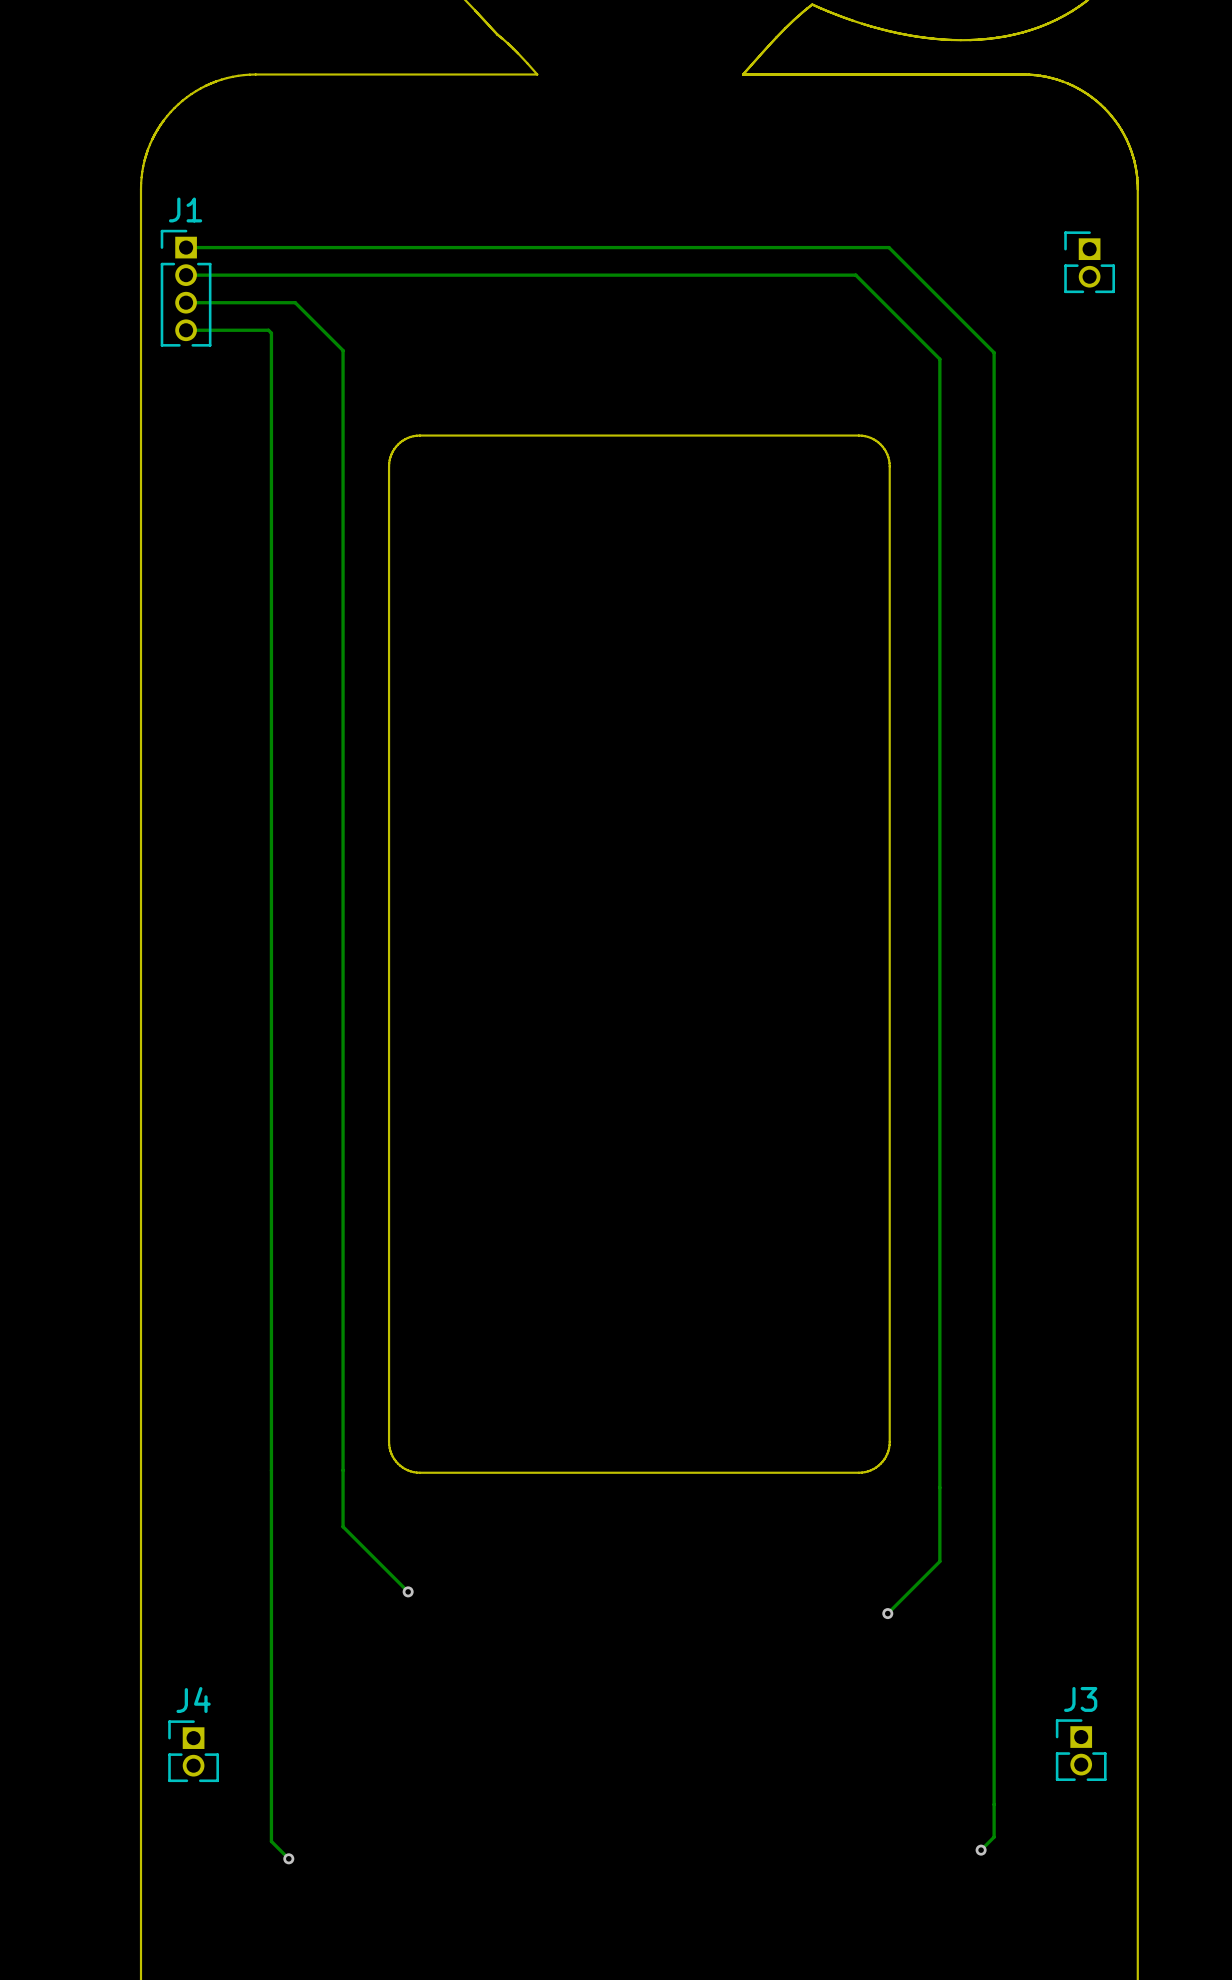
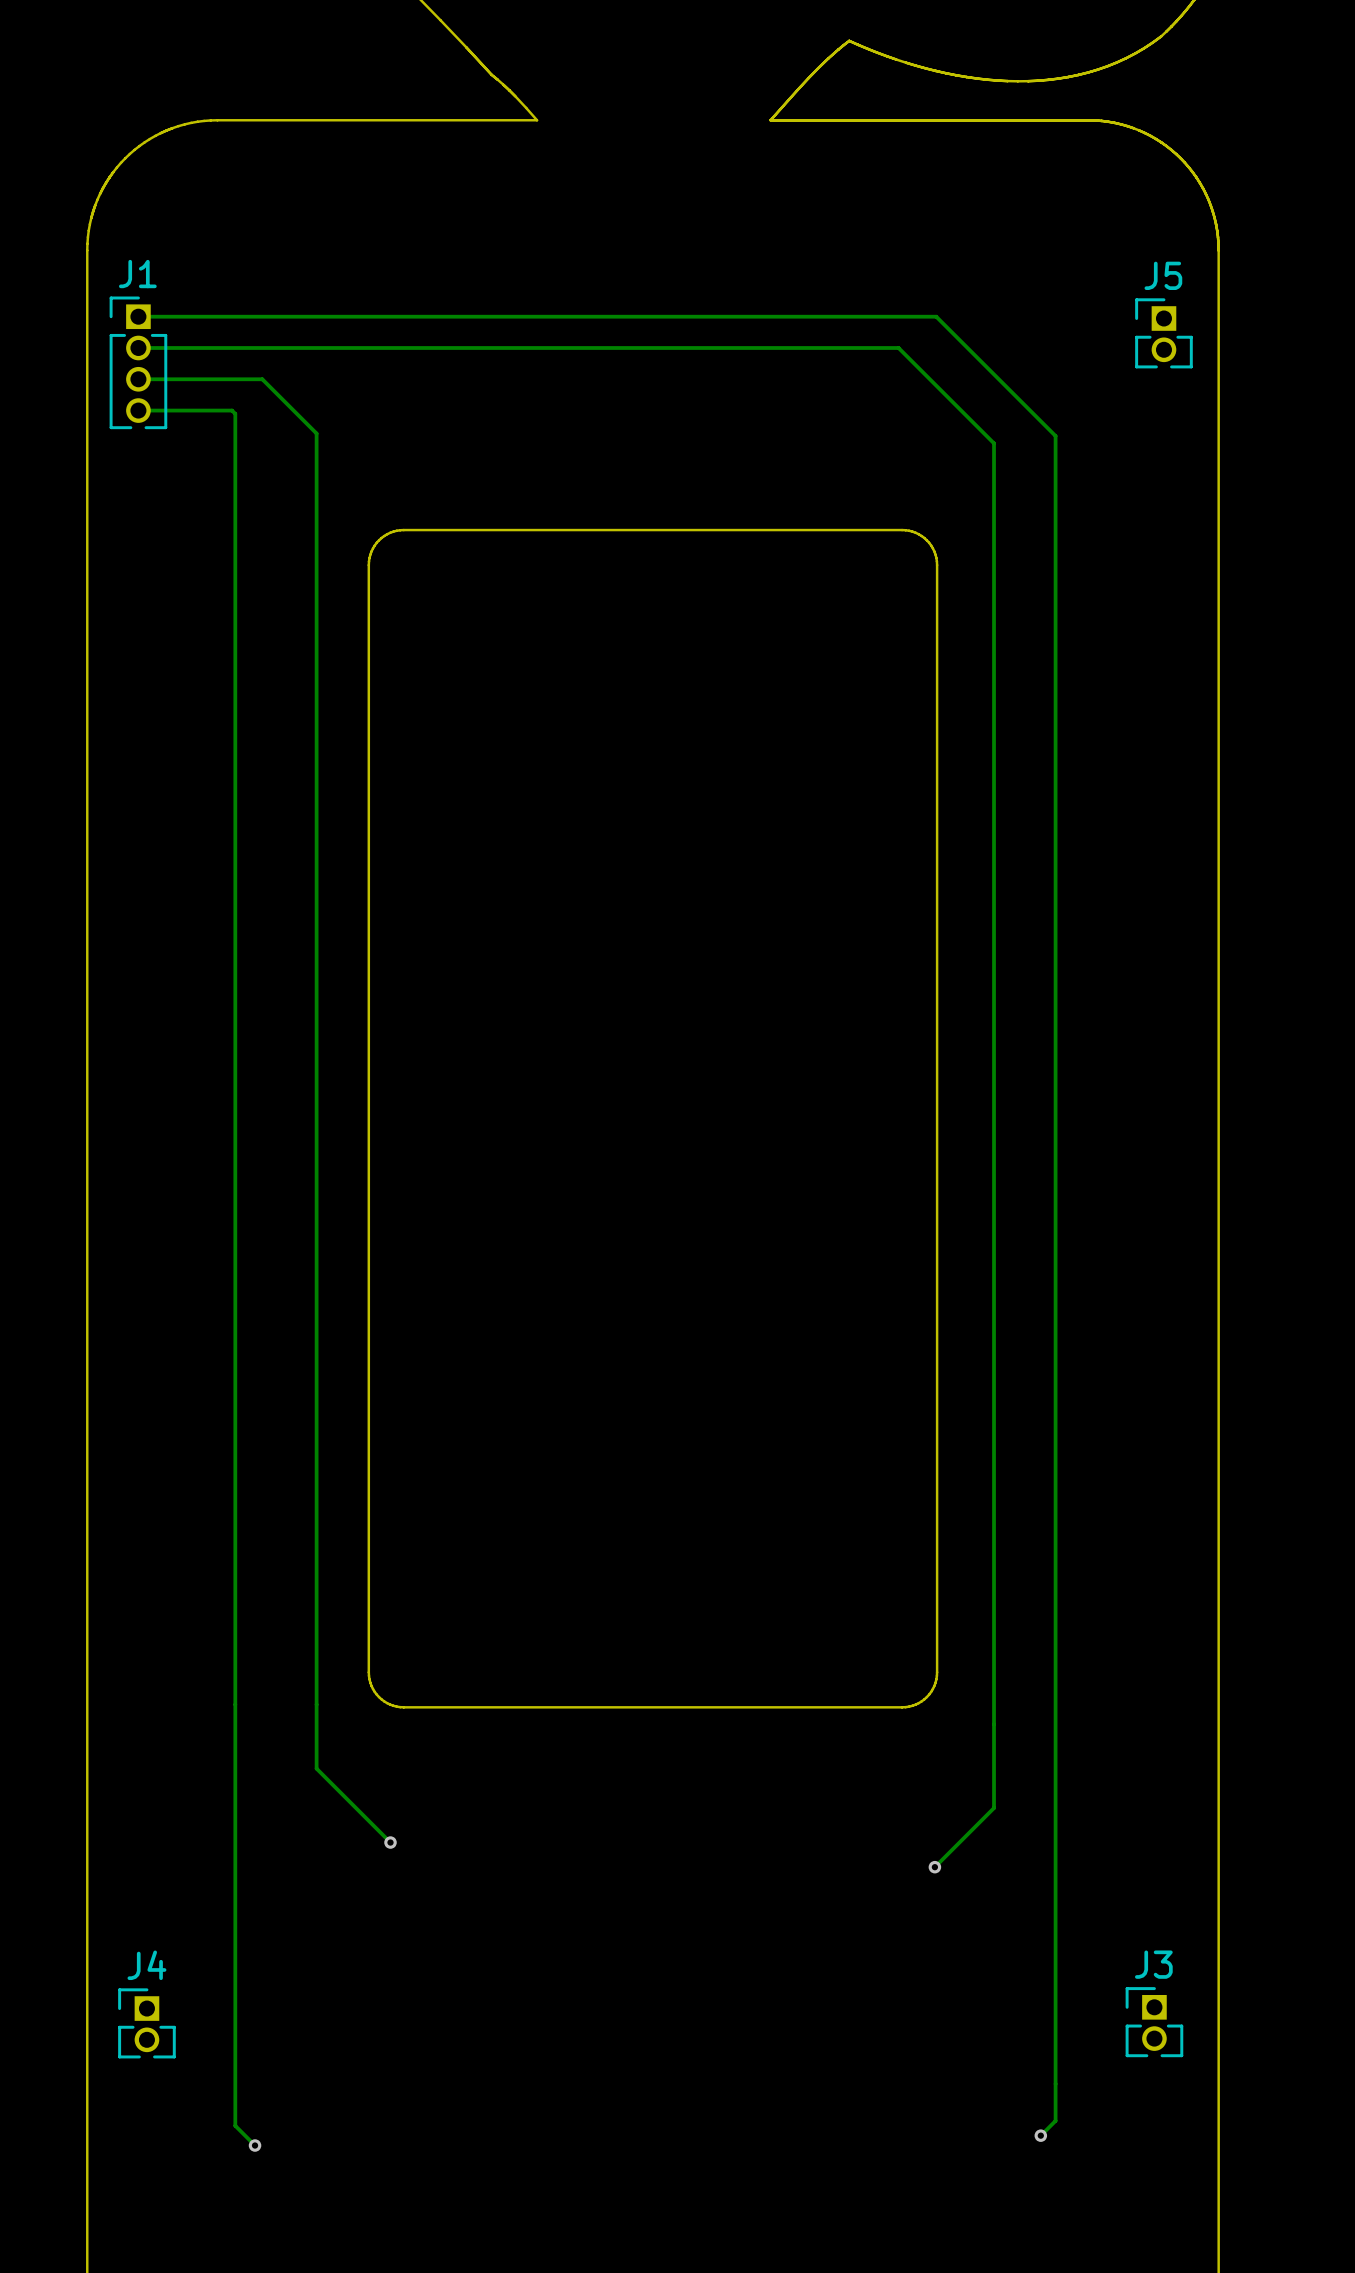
J5 name: none -> J5 (1163, 275)

